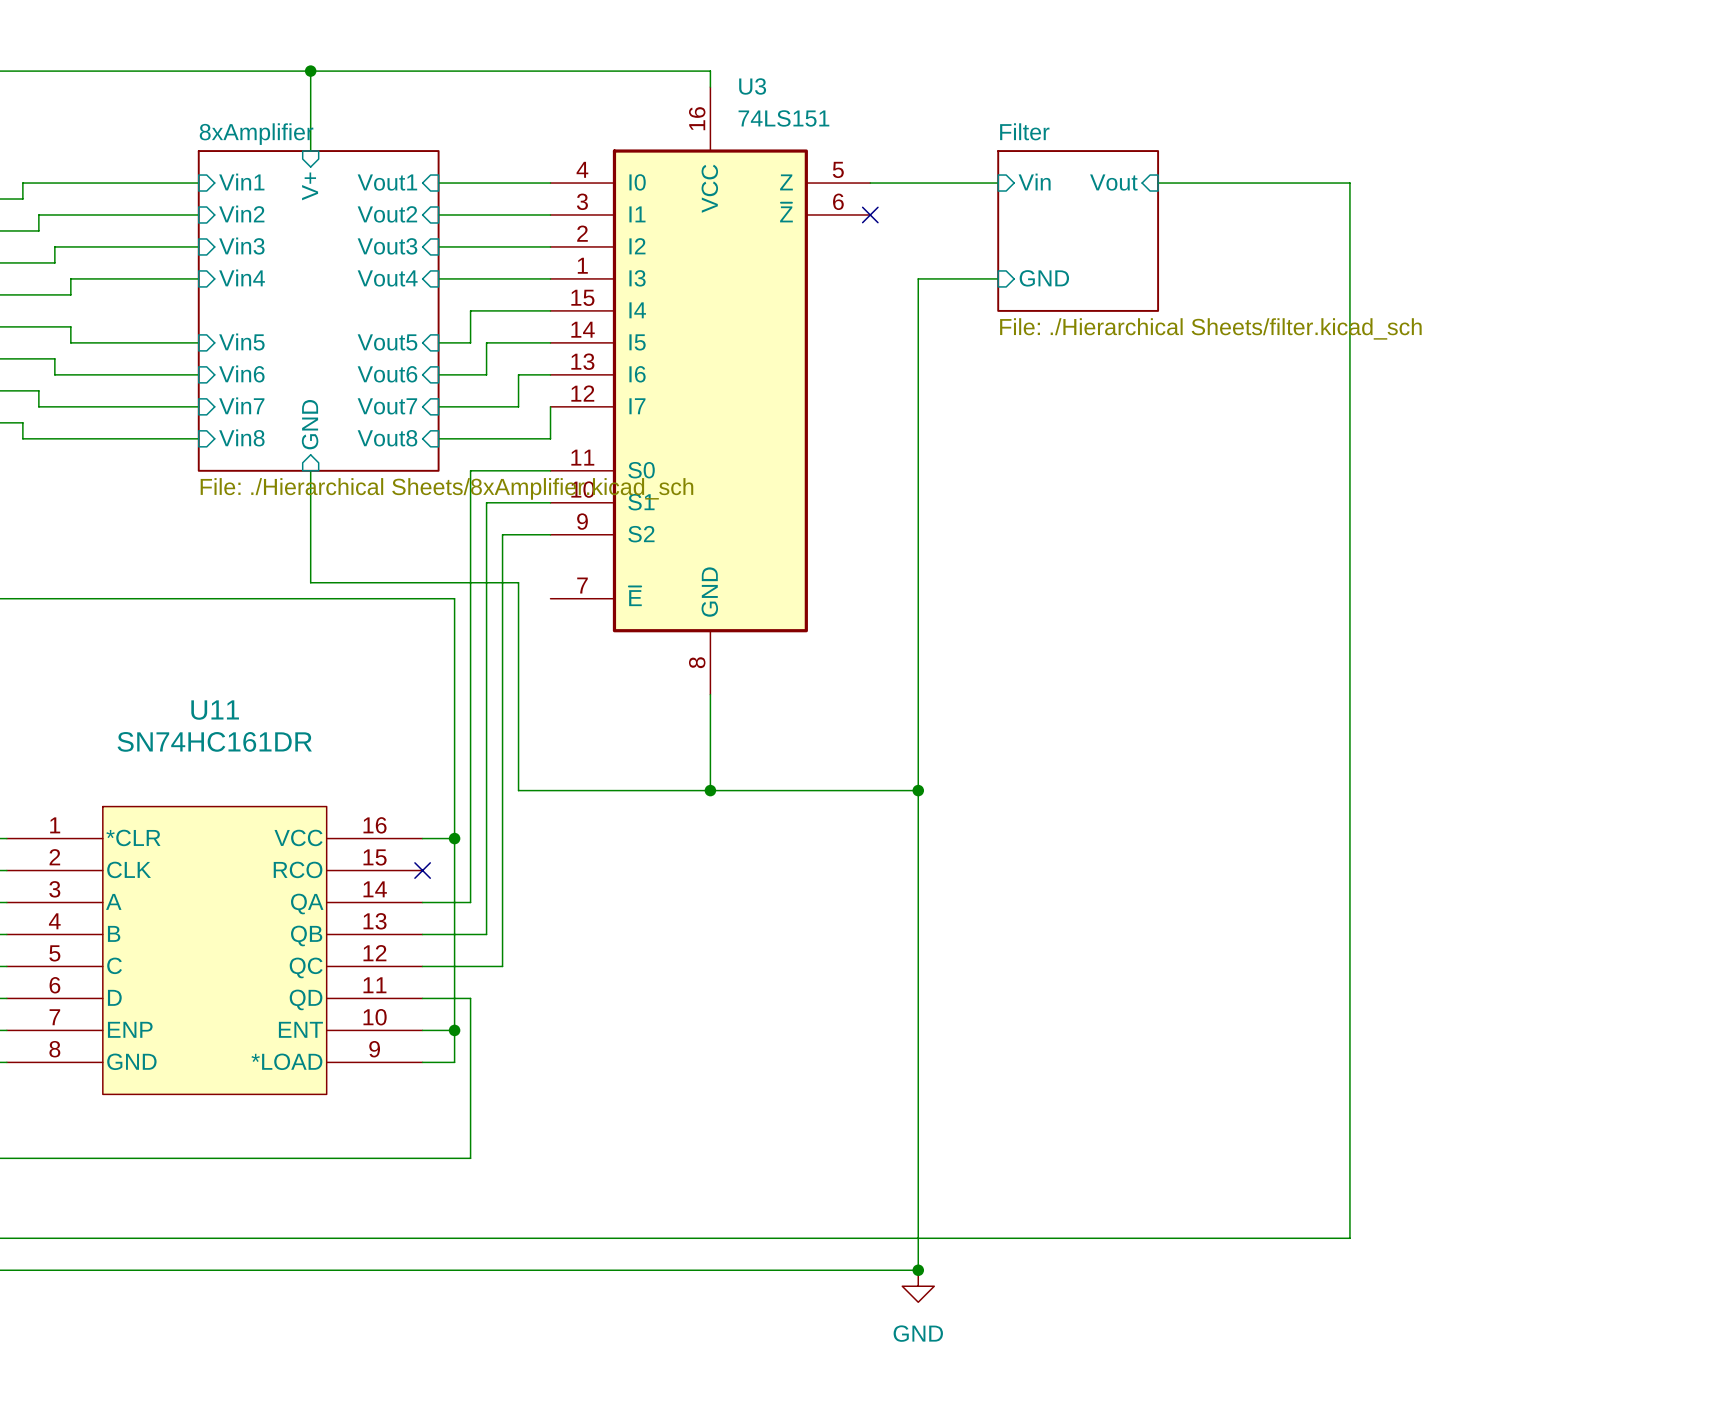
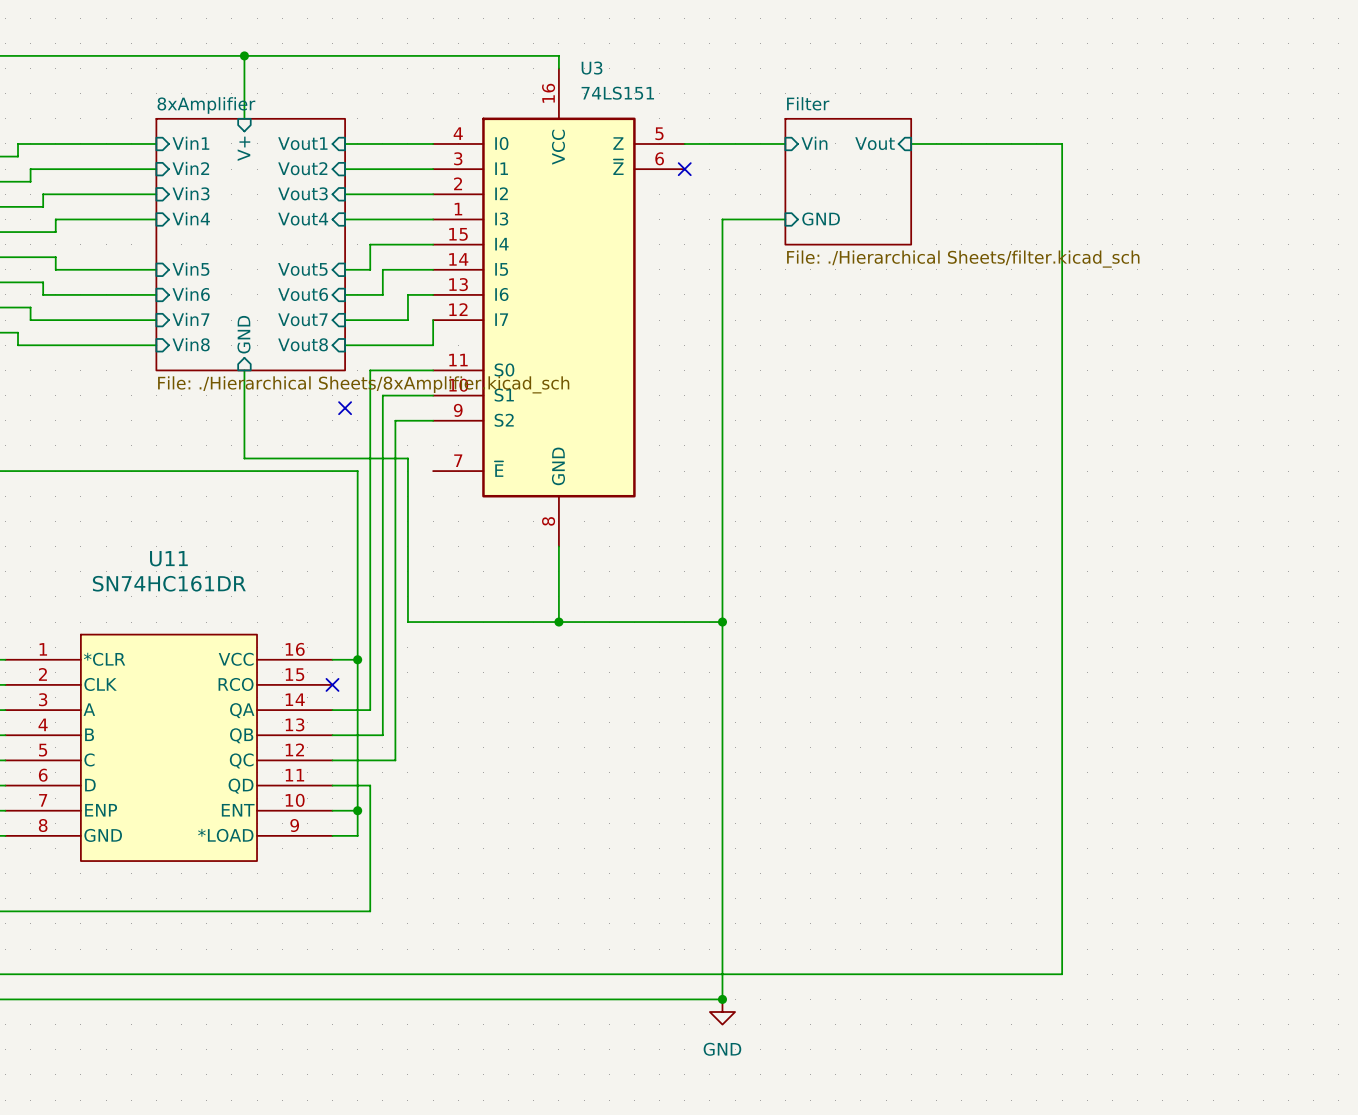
no-connect mark: none -> (345, 408)

